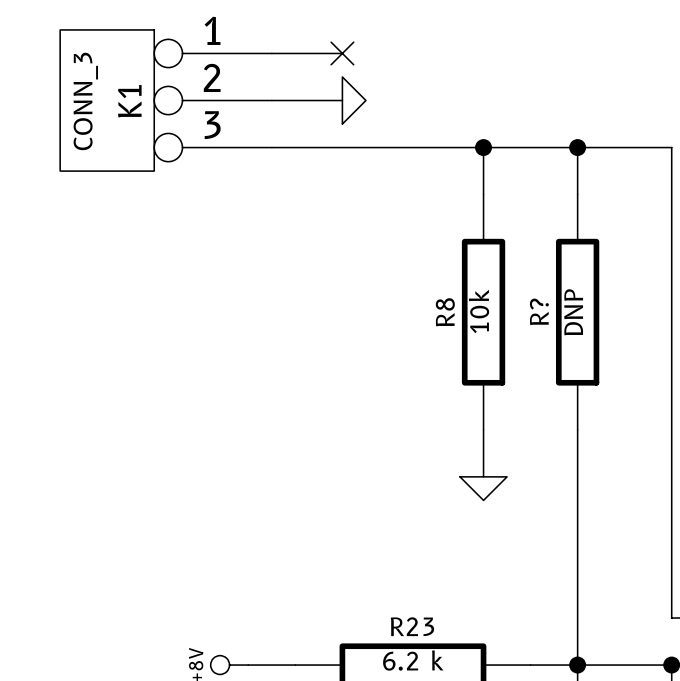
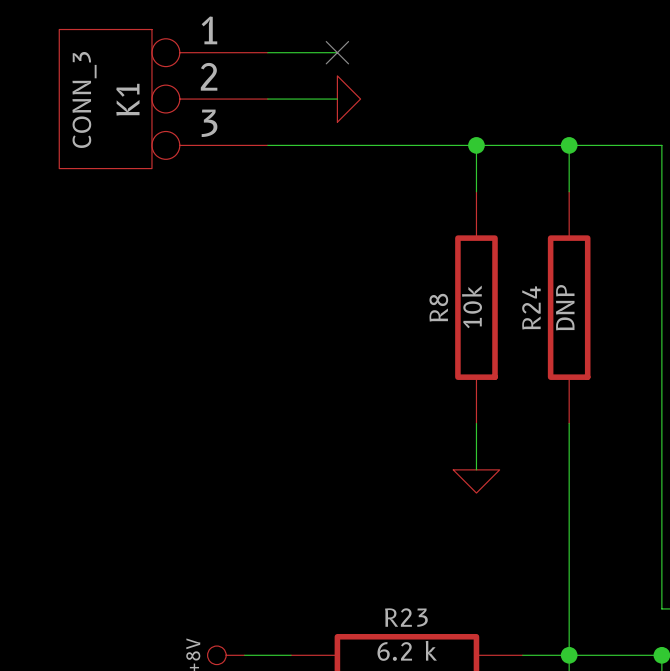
R? name: R? (539, 311) -> R24 (531, 307)

